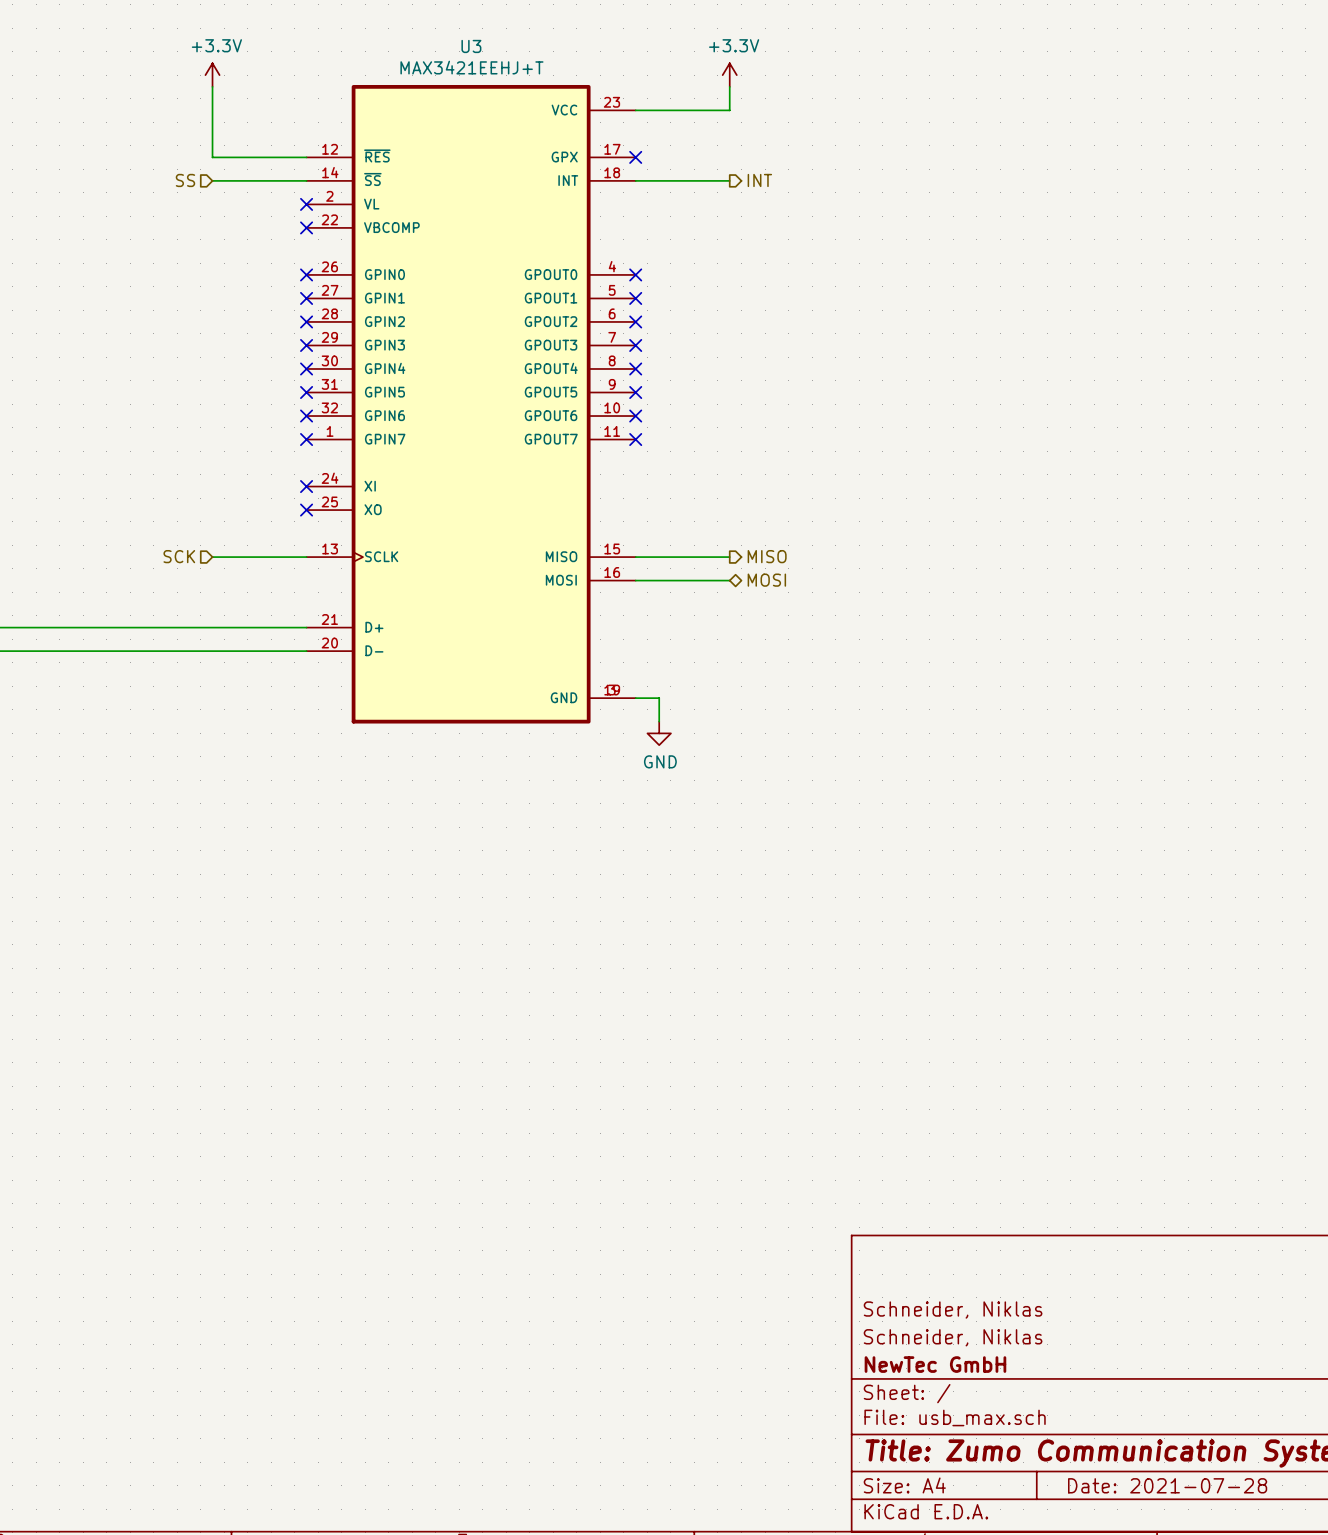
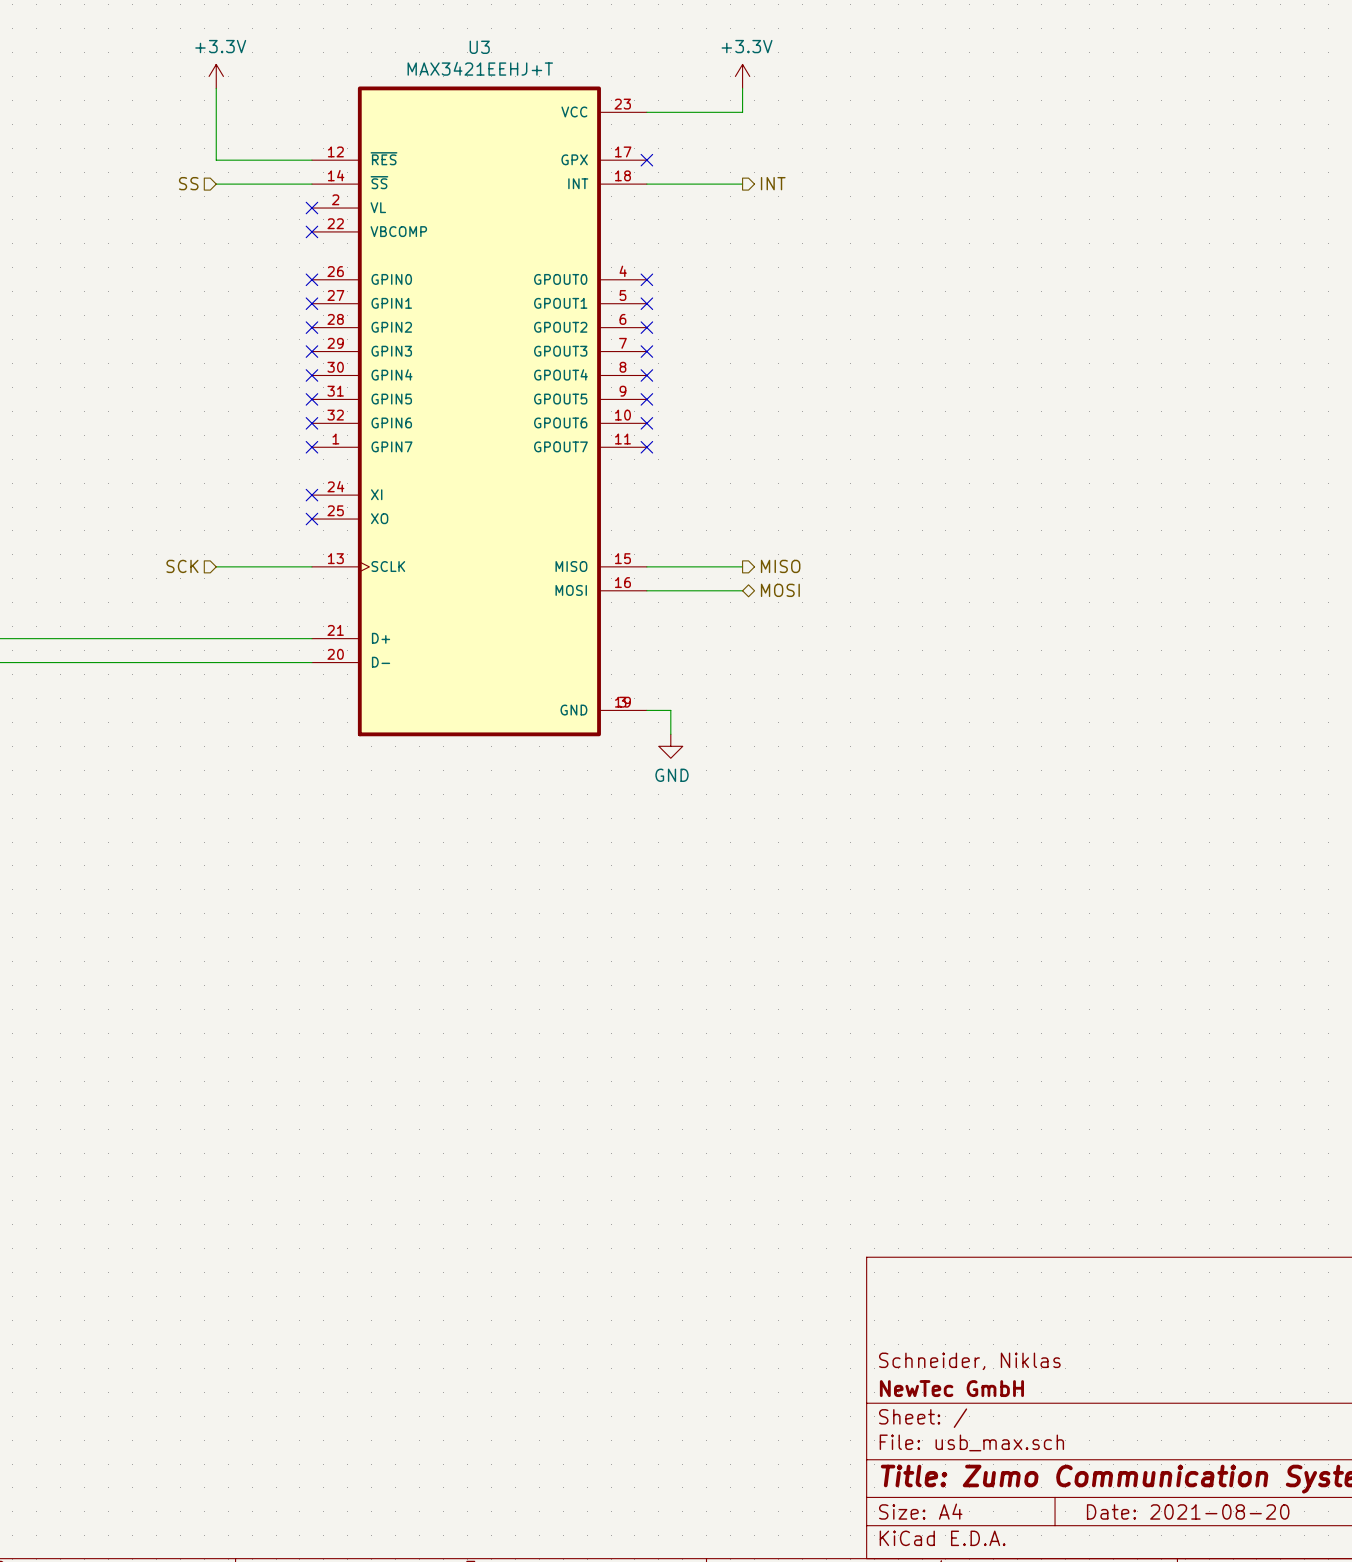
title block: Schneider, Niklas (953, 1310) -> none
title block: Date: 2021-07-28 (1167, 1485) -> Date: 2021-08-20 (1188, 1511)

